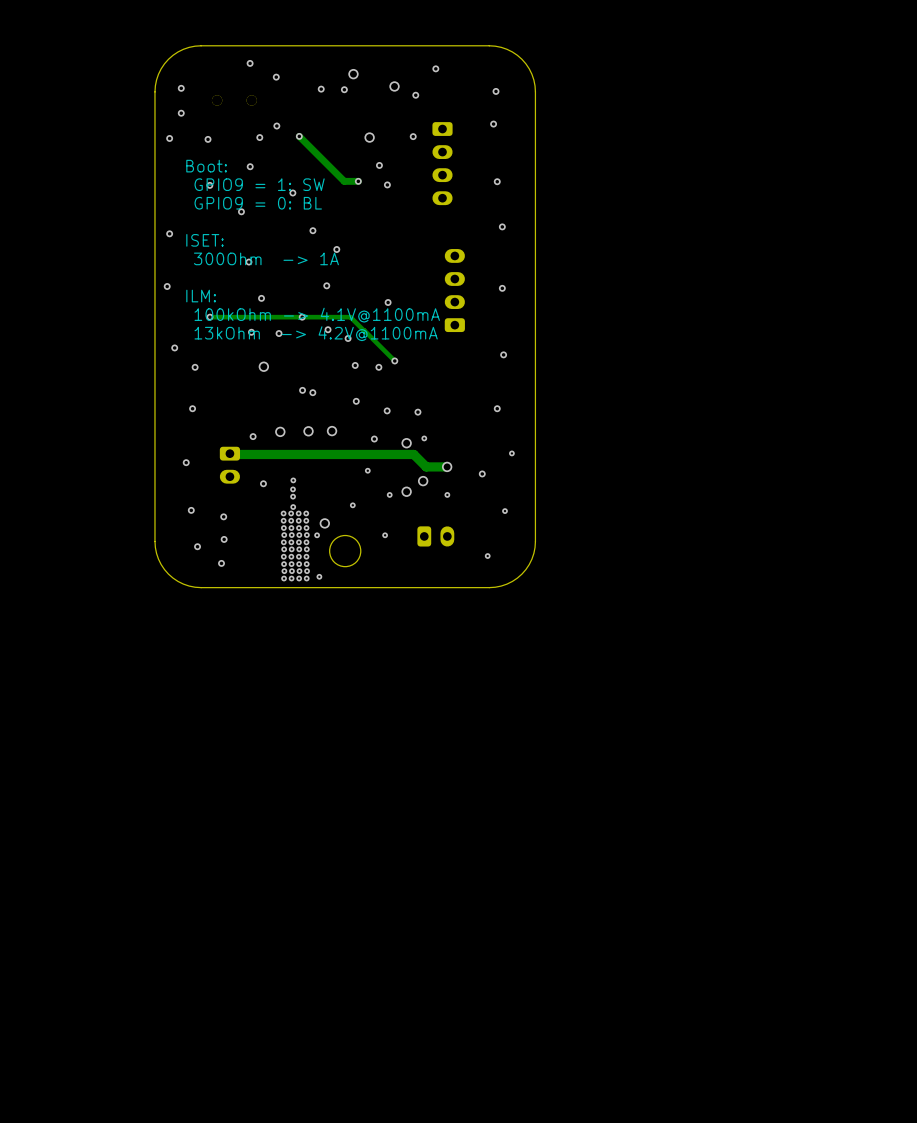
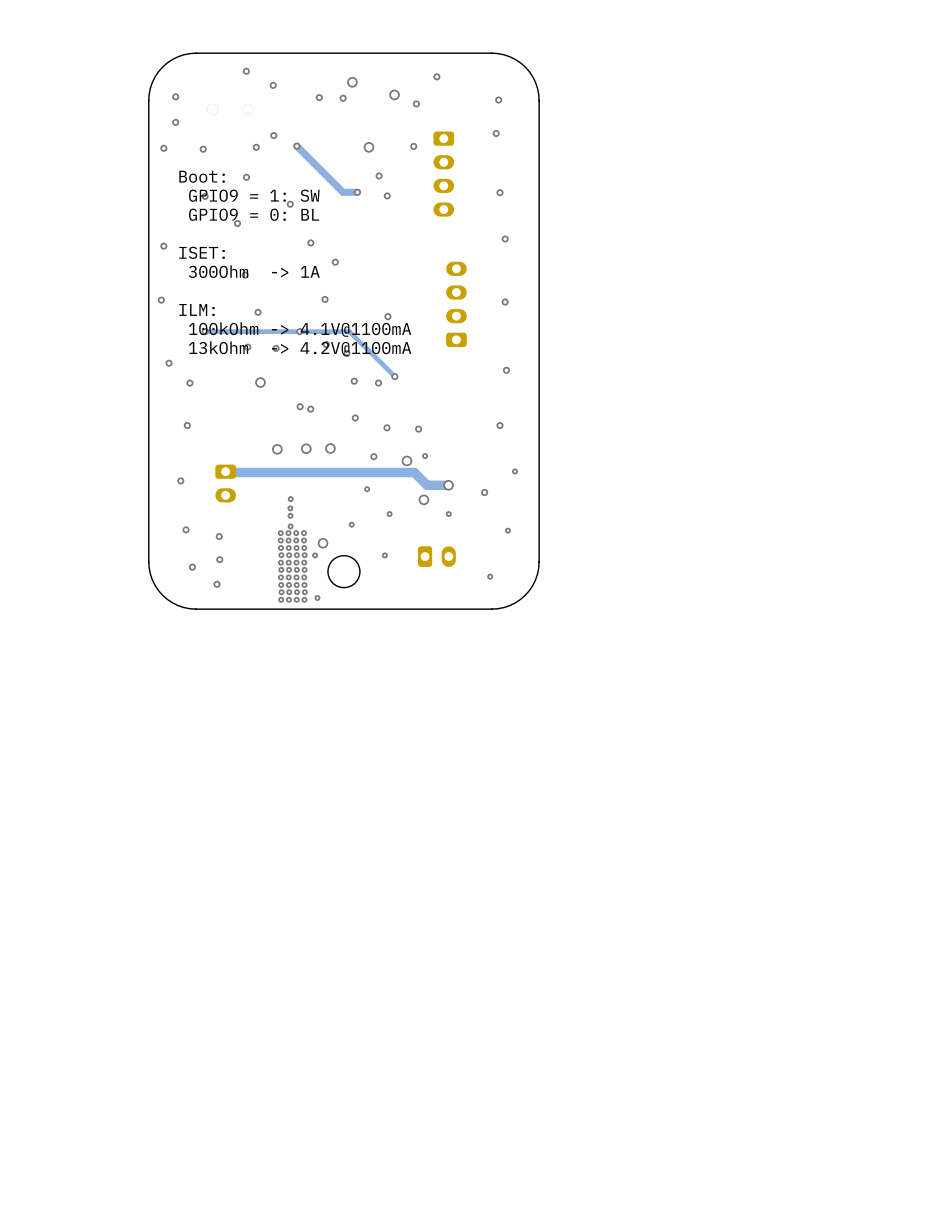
via: (253, 436) -> none
via: (263, 483) -> none
via: (406, 491) -> none

